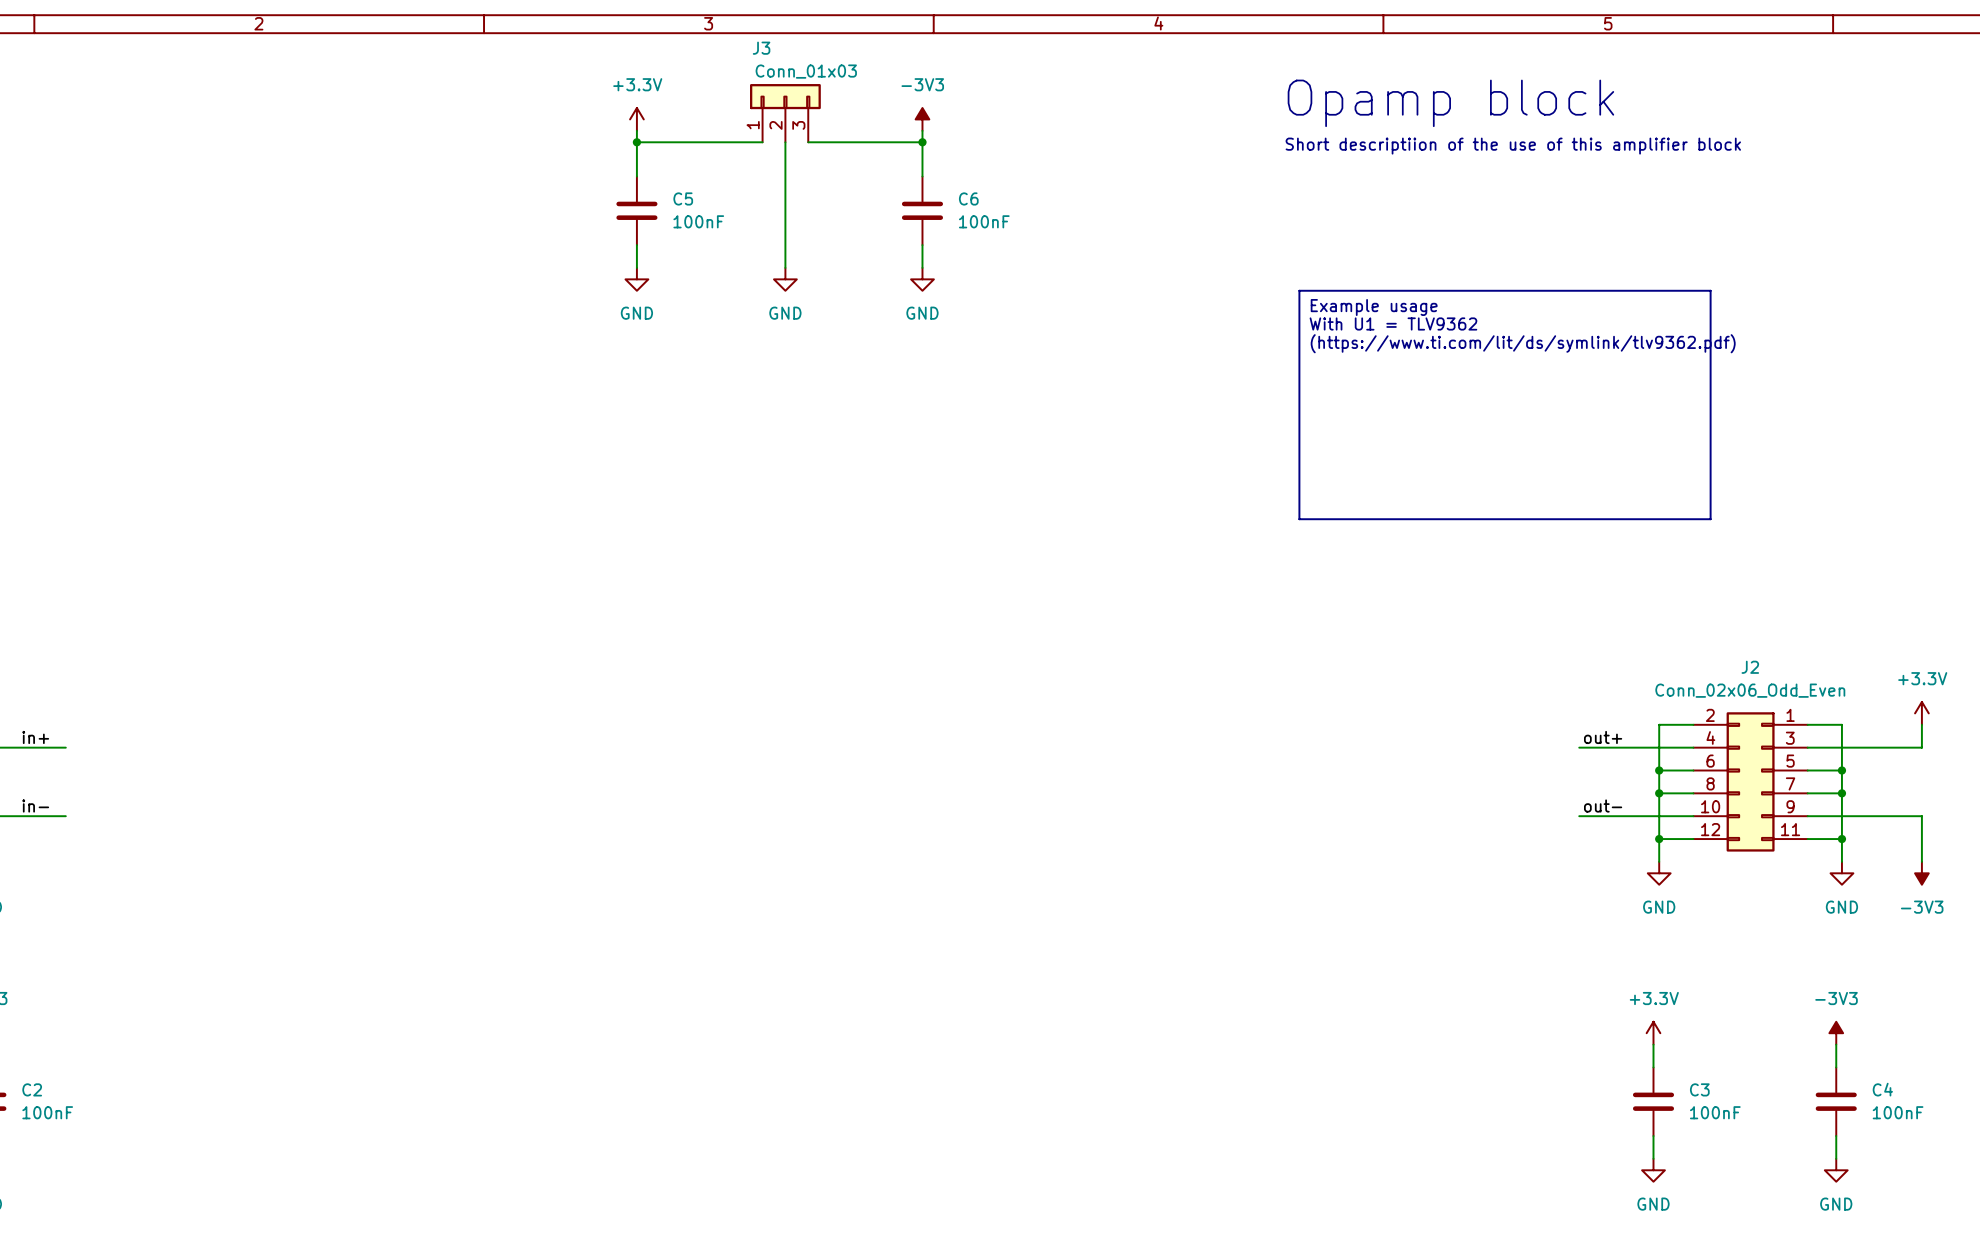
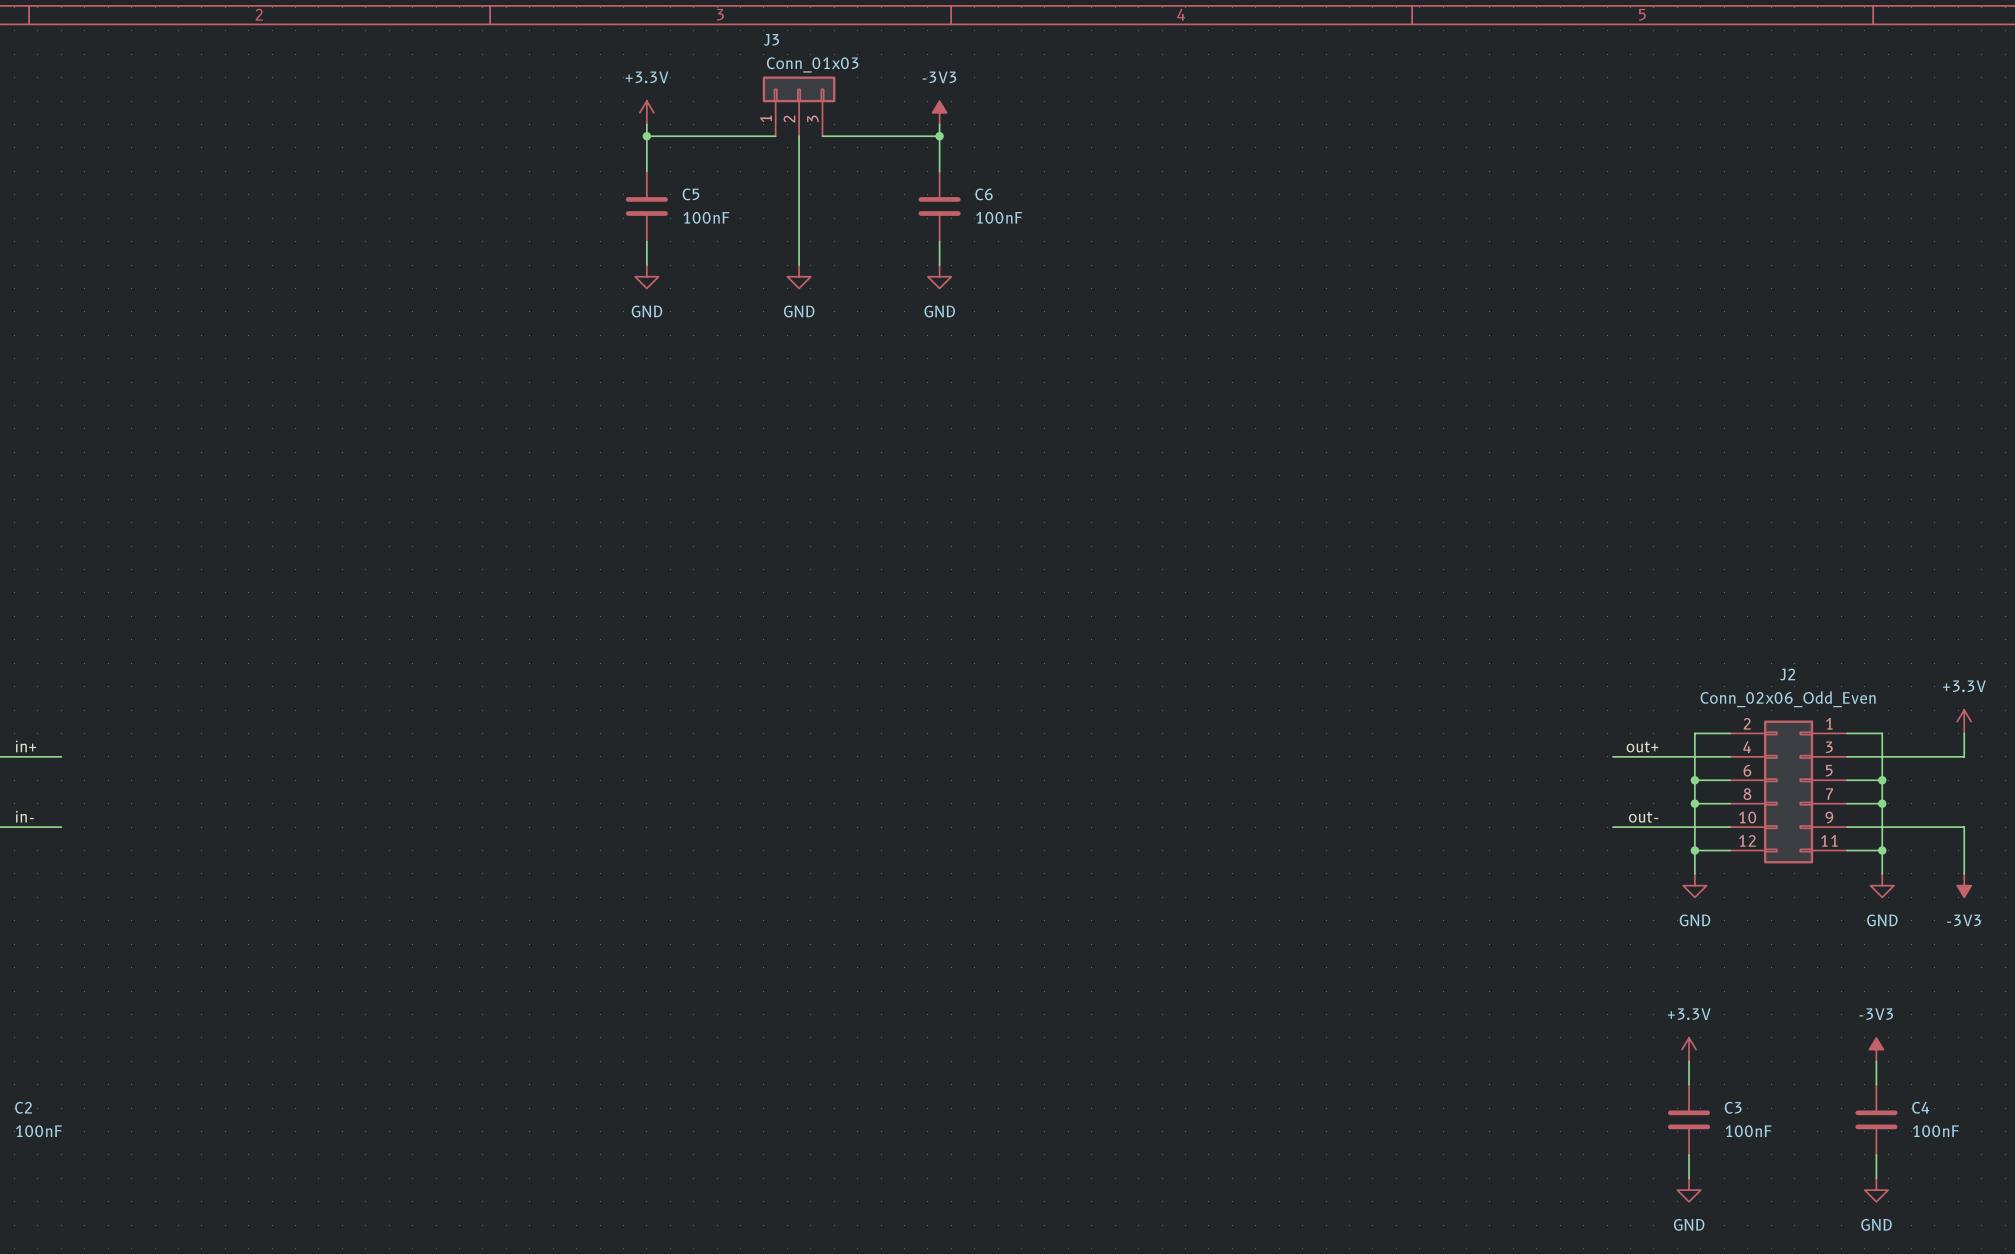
text: Opamp block (1450, 103) -> none
text: Short descriptiion of the use of this amplifier block (1513, 146) -> none
line: (1299, 290) (1710, 290) (1710, 519) (1299, 519) (1299, 290) -> none
text: Example usage (1374, 307) -> none
text: With U1 = TLV9362 (1393, 323) -> none
text: (https://www.ti.com/lit/ds/symlink/tlv9362.pdf) (1523, 343) -> none

